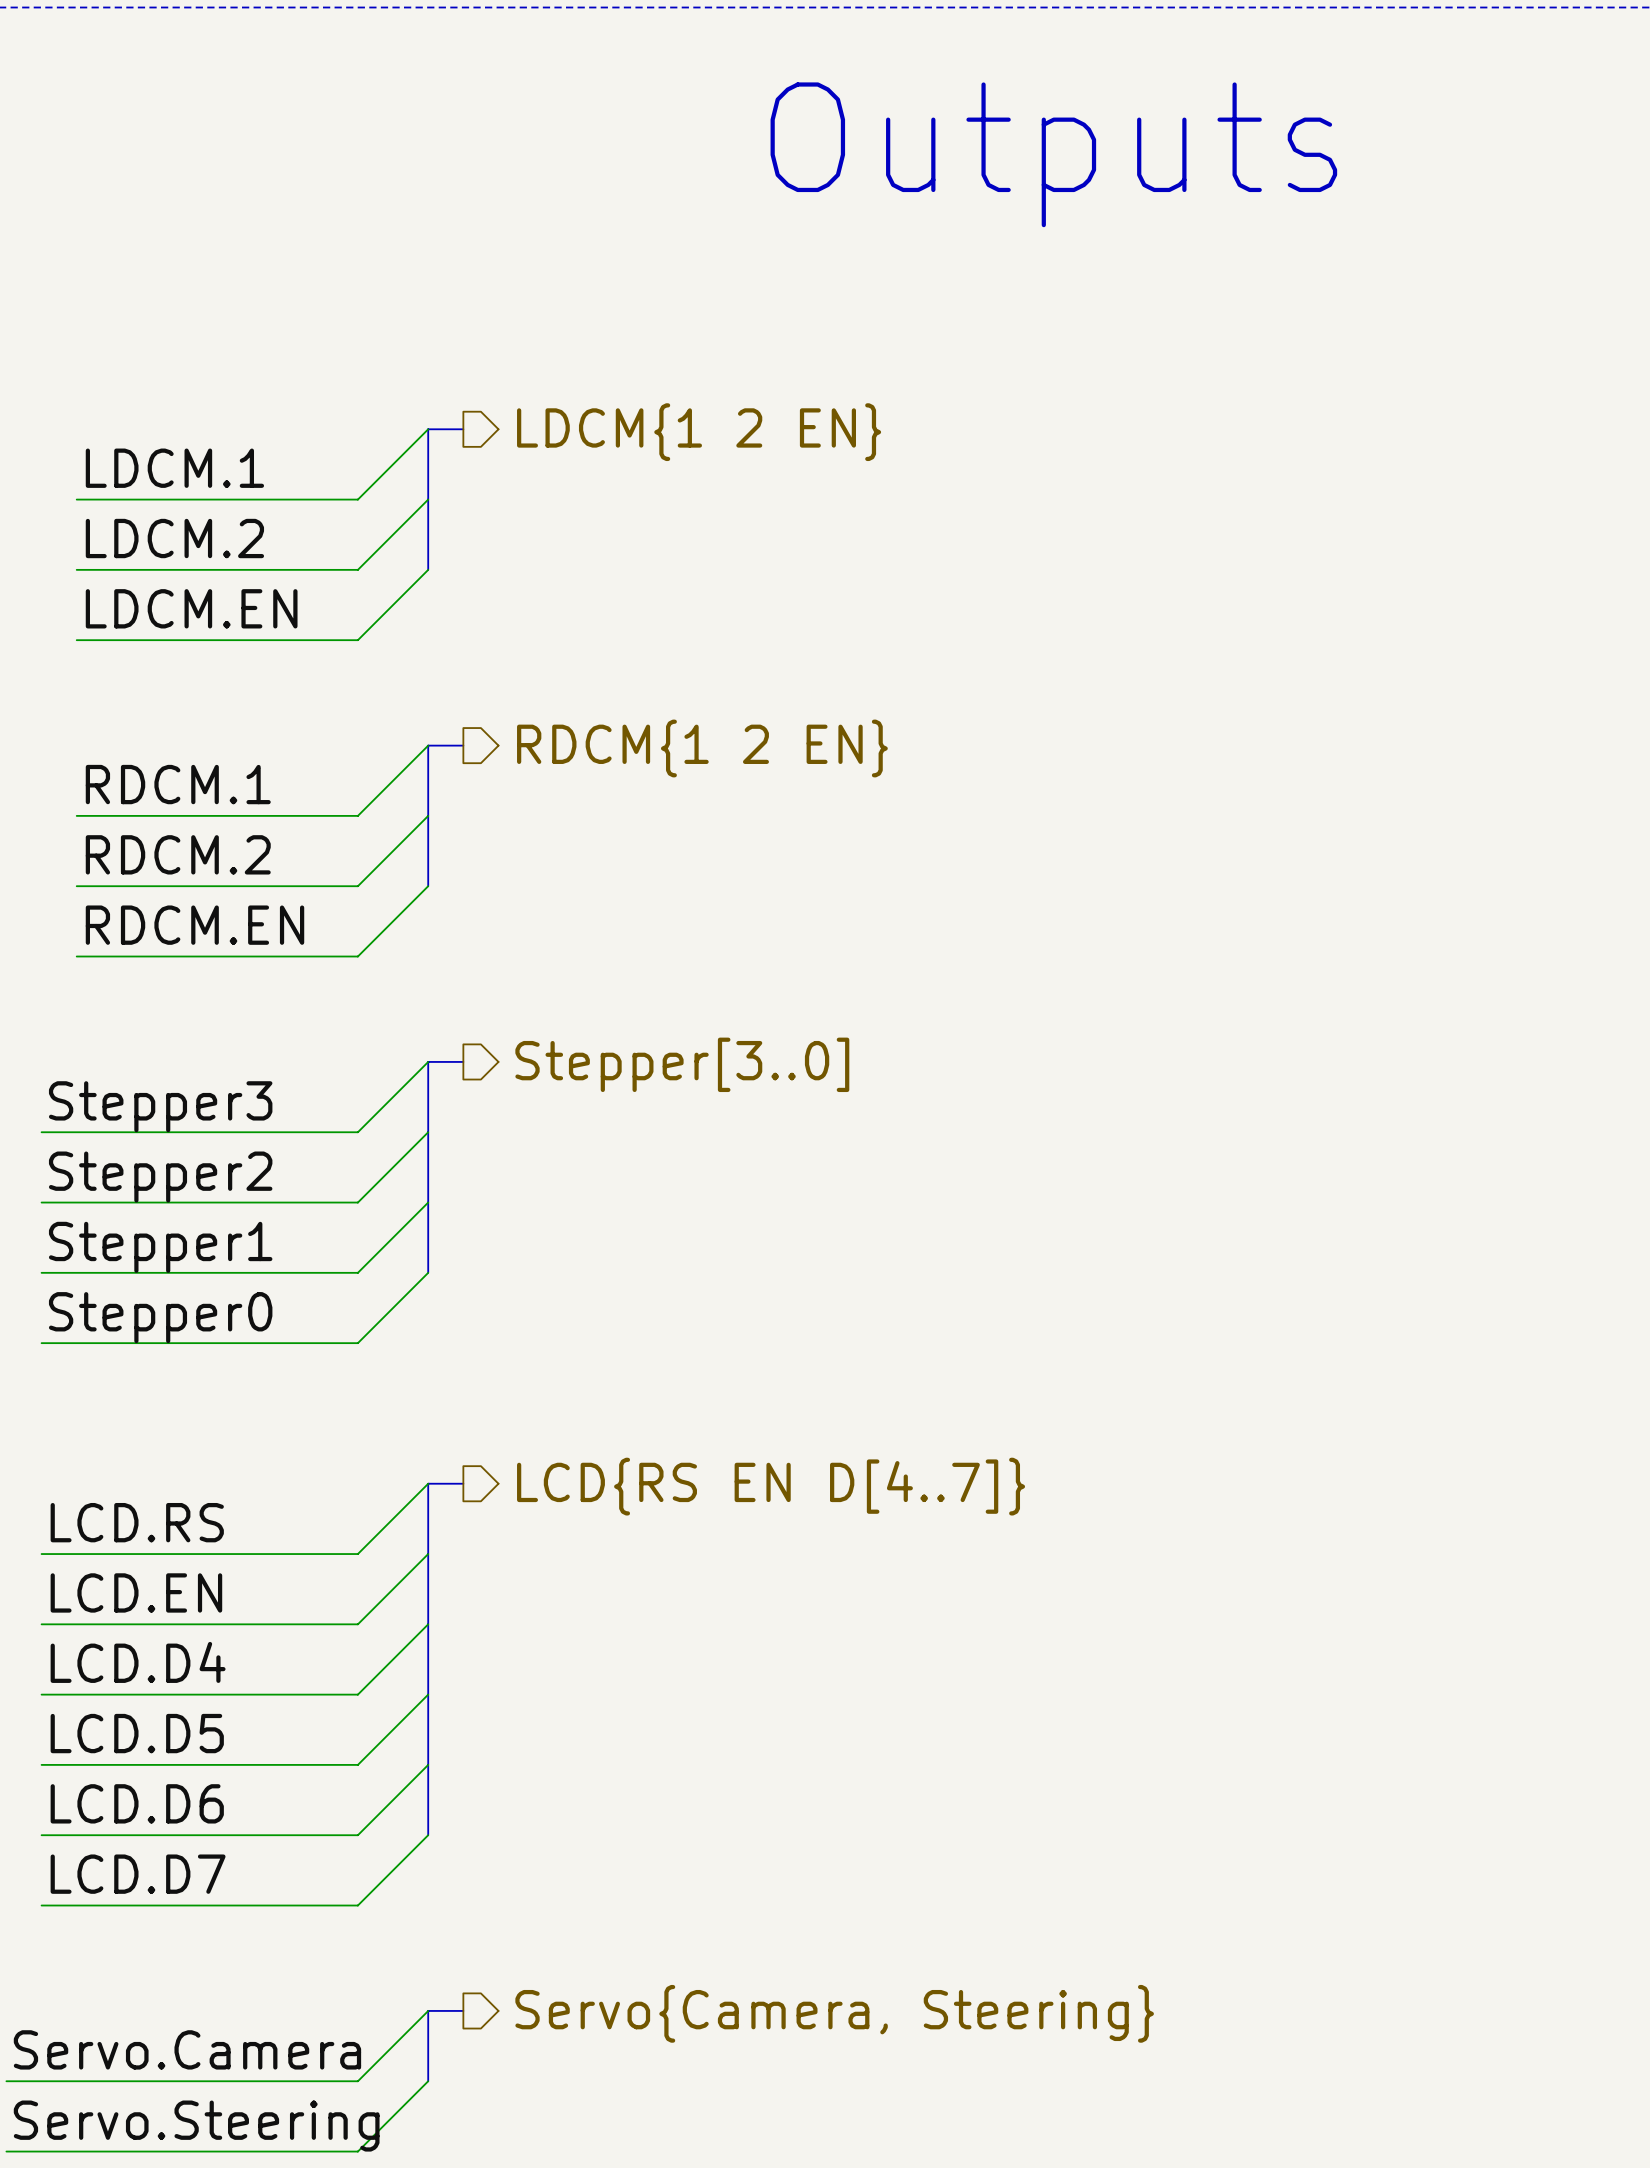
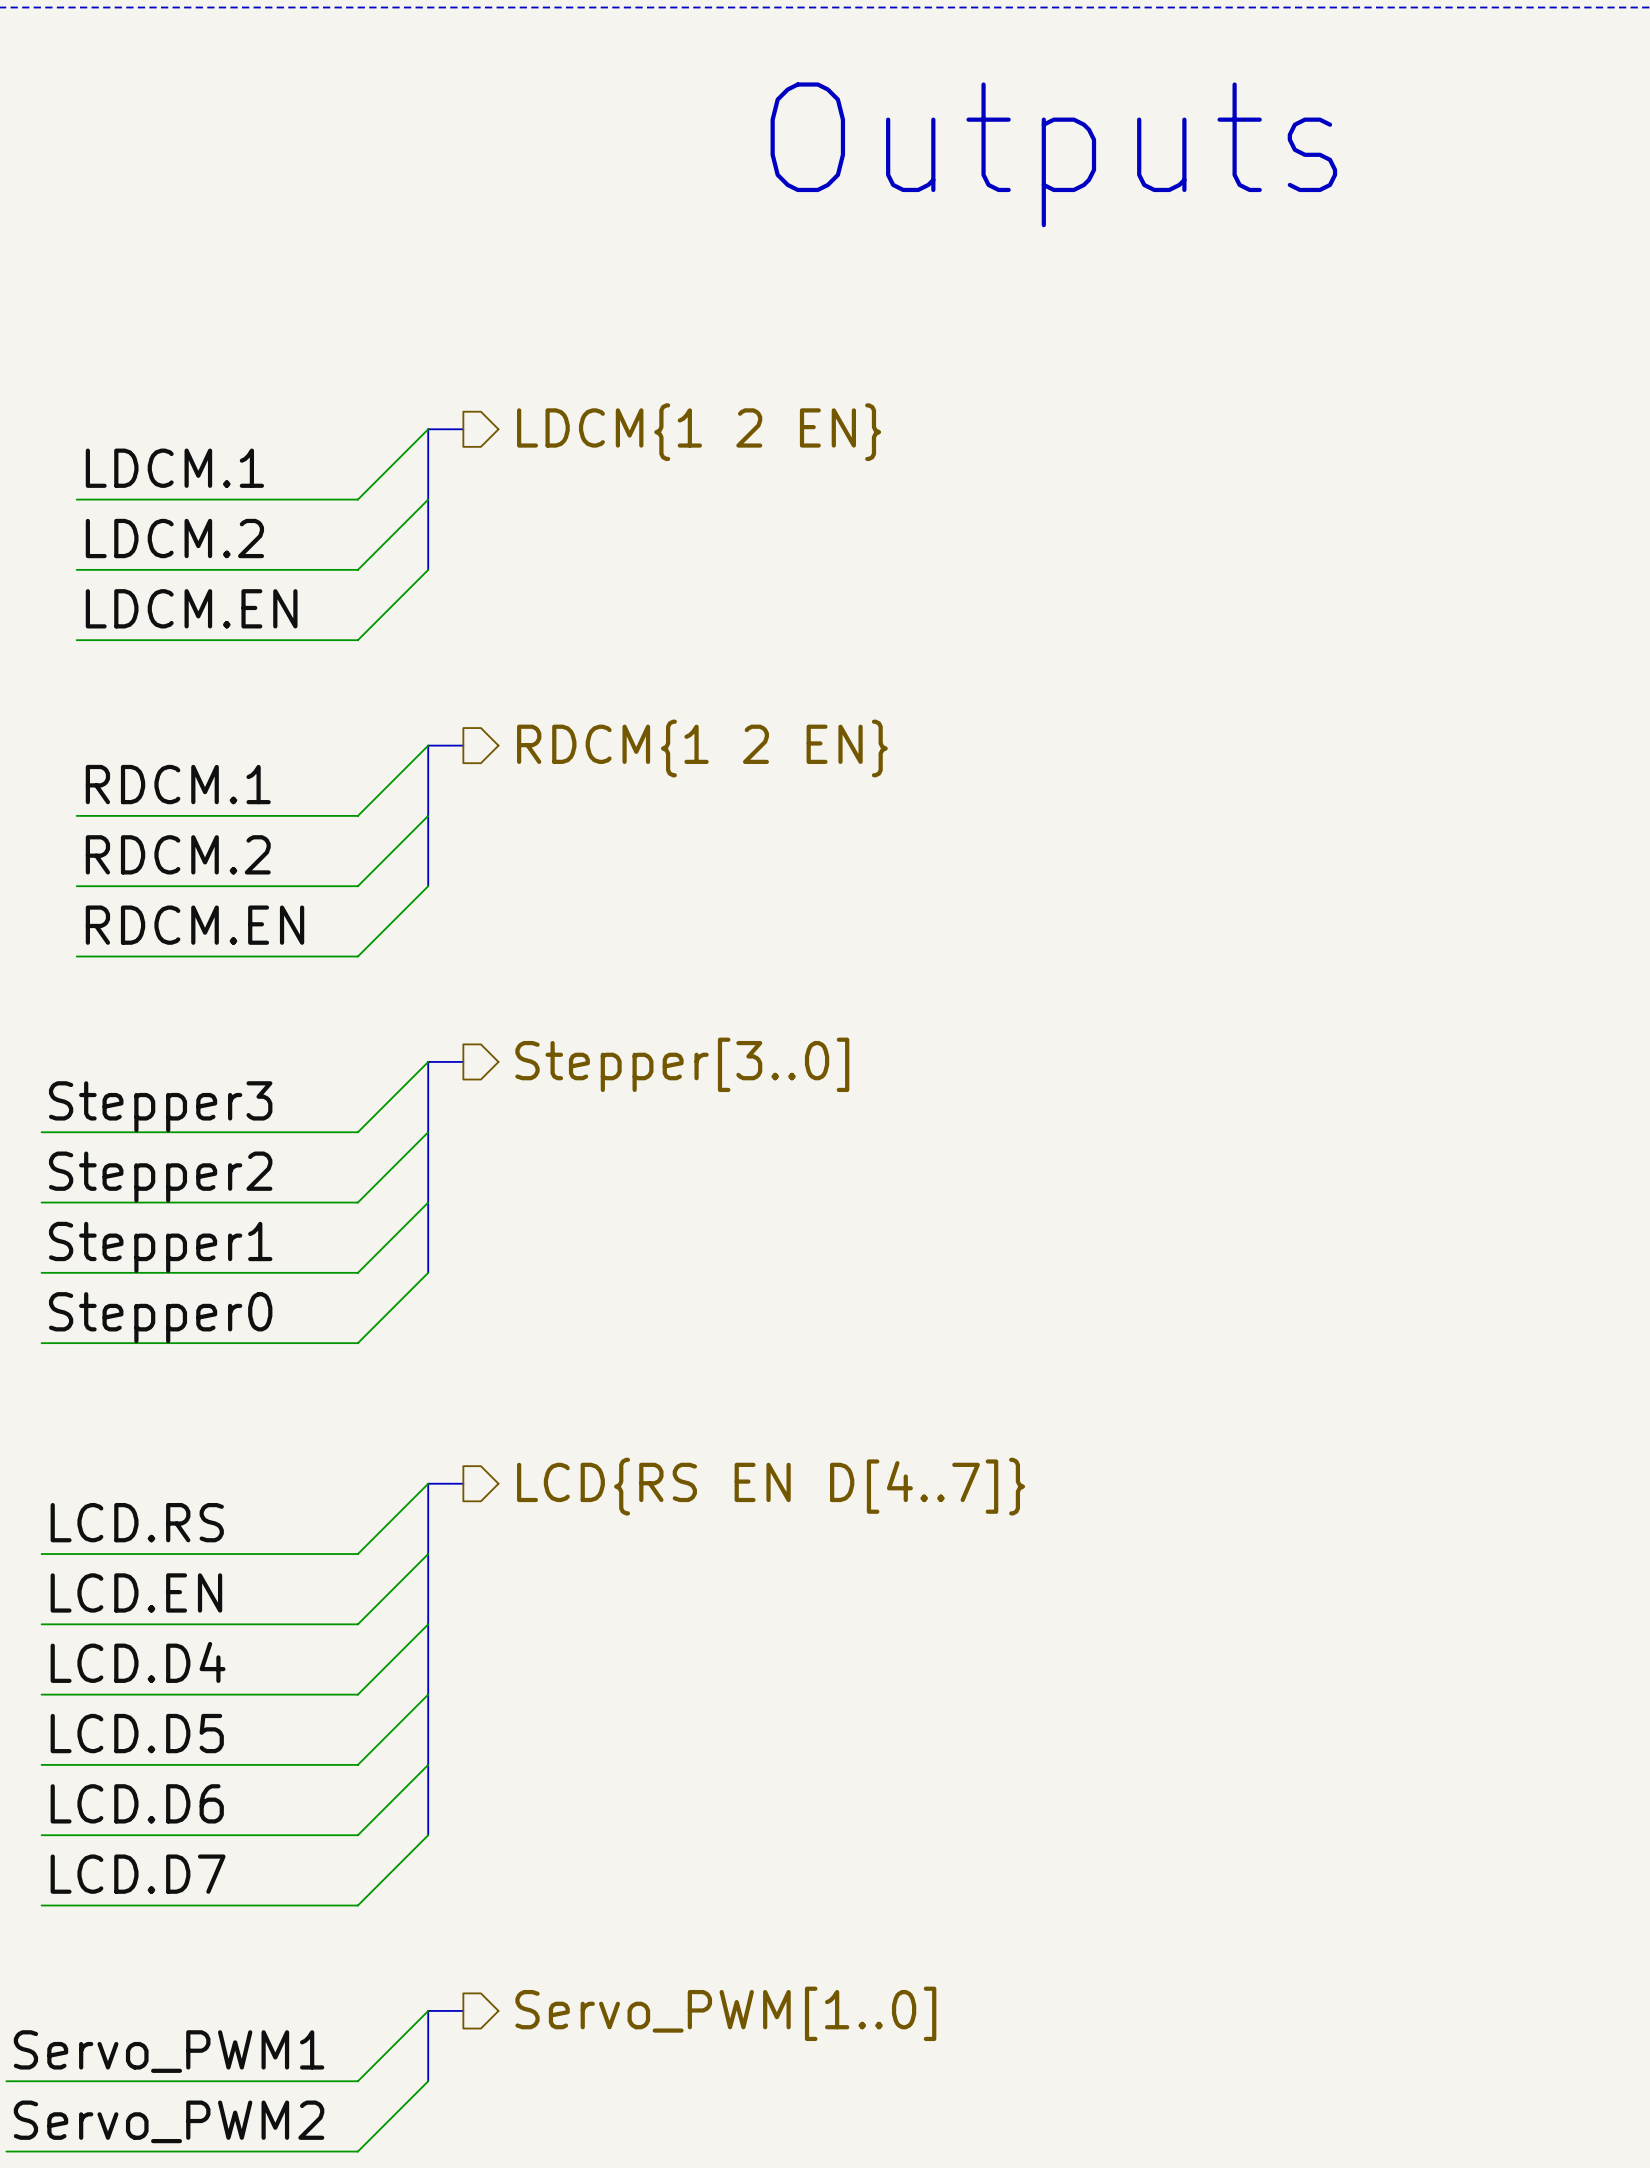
hierarchical label: Servo{Camera, Steering} (834, 2013) -> Servo_PWM[1..0] (725, 2013)
label: Servo.Camera (187, 2049) -> Servo_PWM1 (169, 2051)
label: Servo.Steering (196, 2126) -> Servo_PWM2 (169, 2121)

